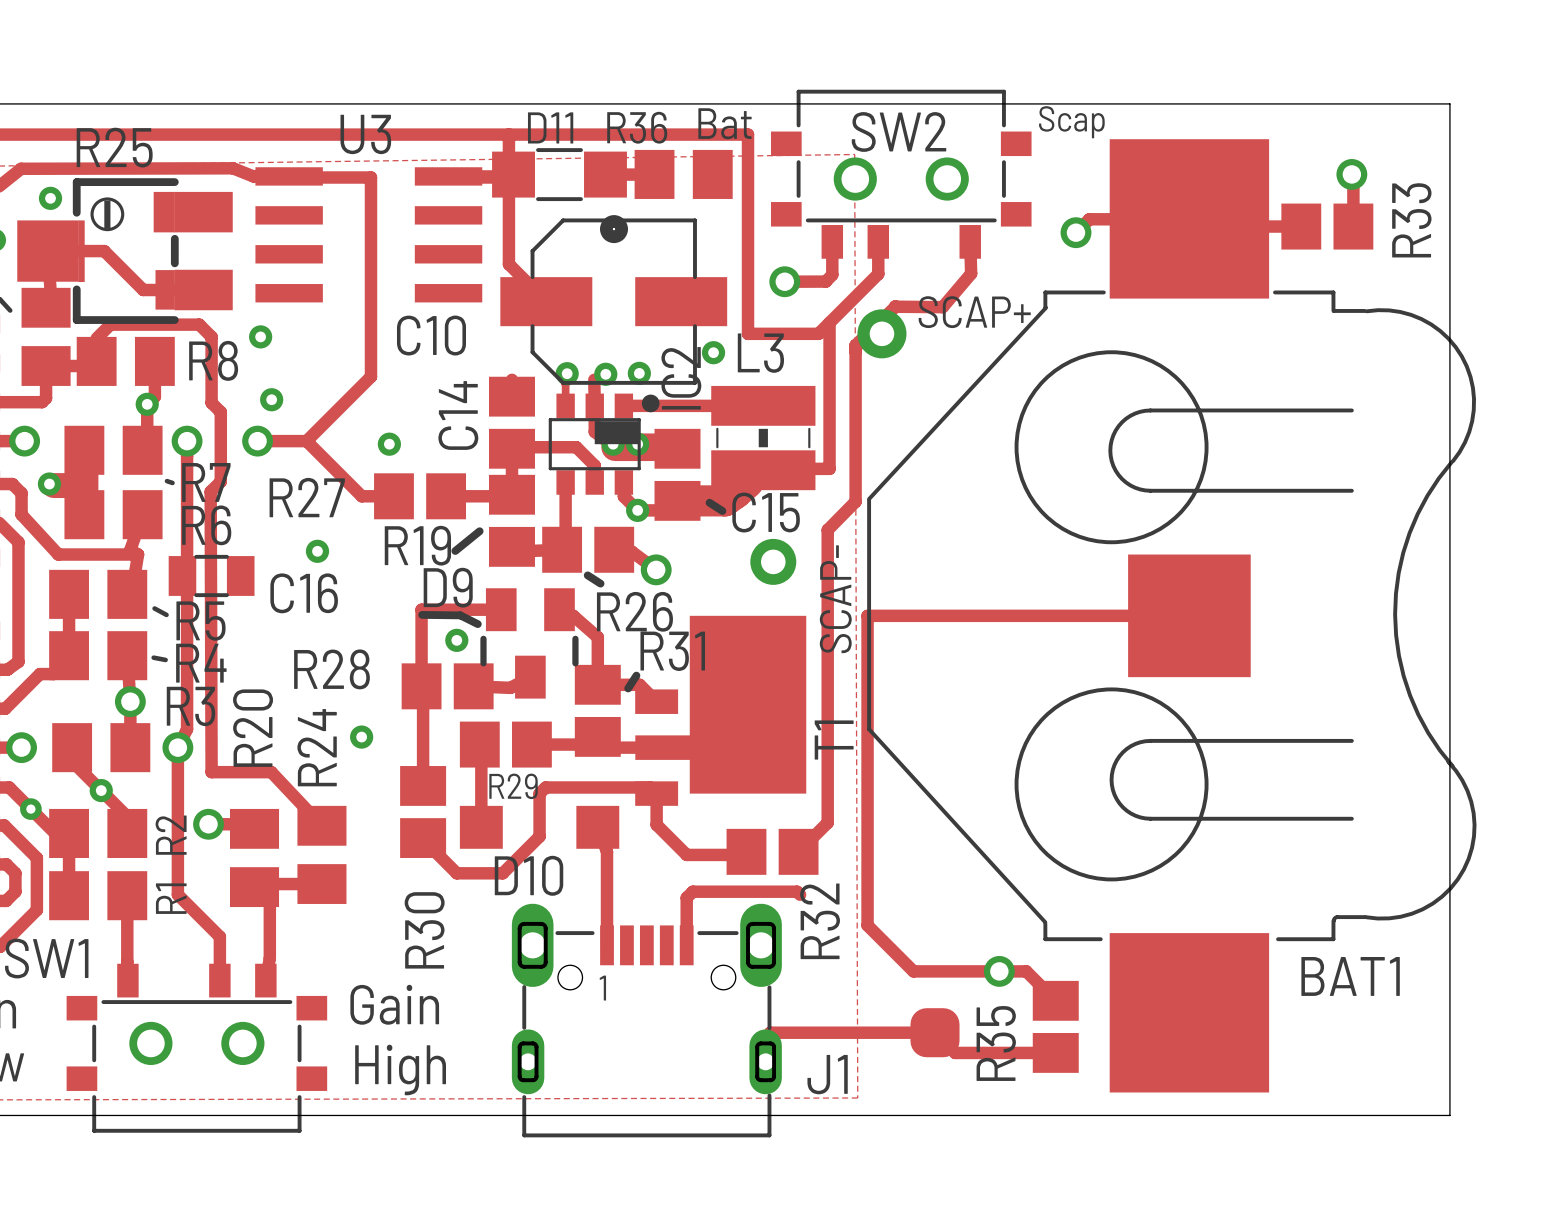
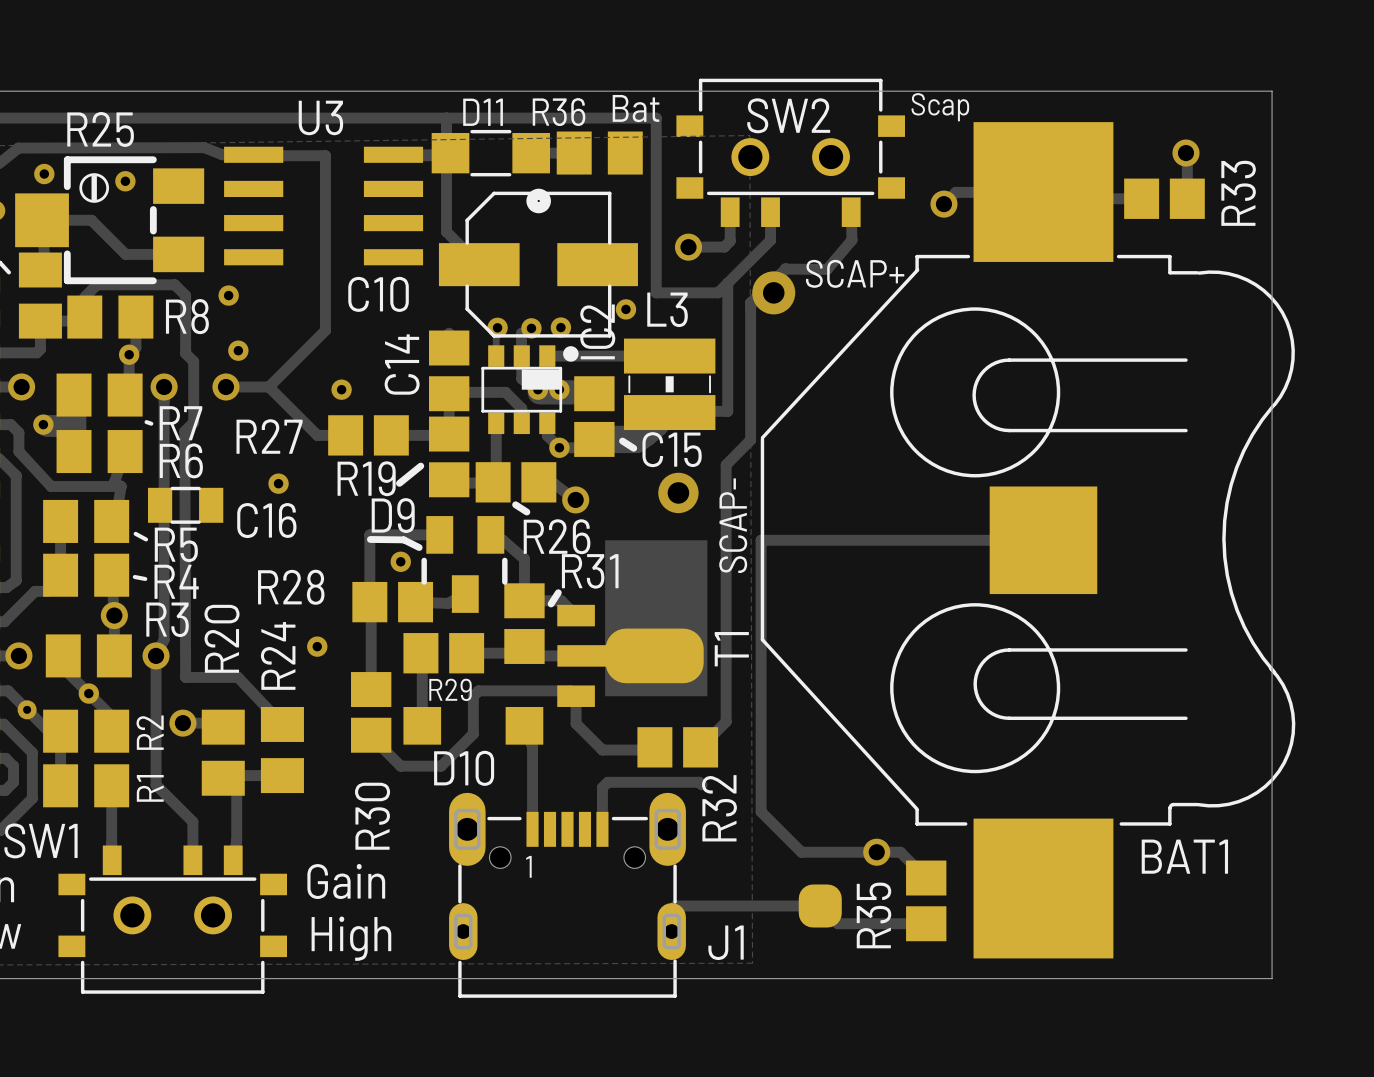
drawing: [153, 191, 175, 233] -> none
via: none -> (125, 181)
drawing: [78, 220, 85, 283] -> none
drawing: [155, 270, 175, 310] -> none

